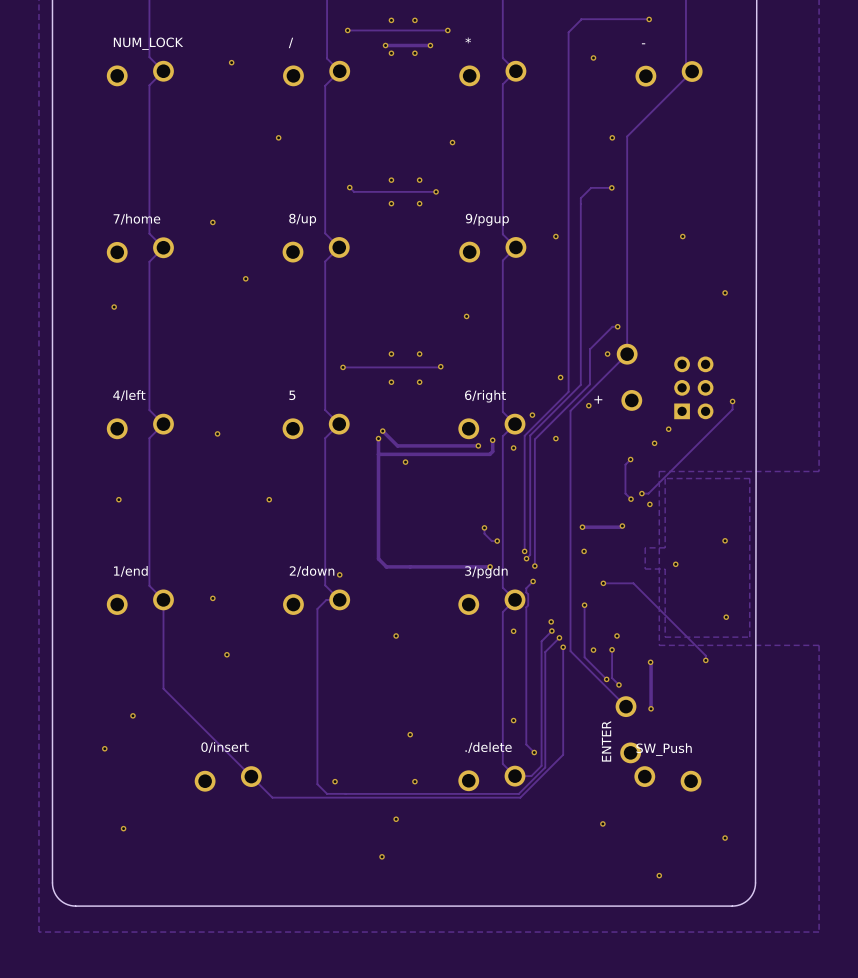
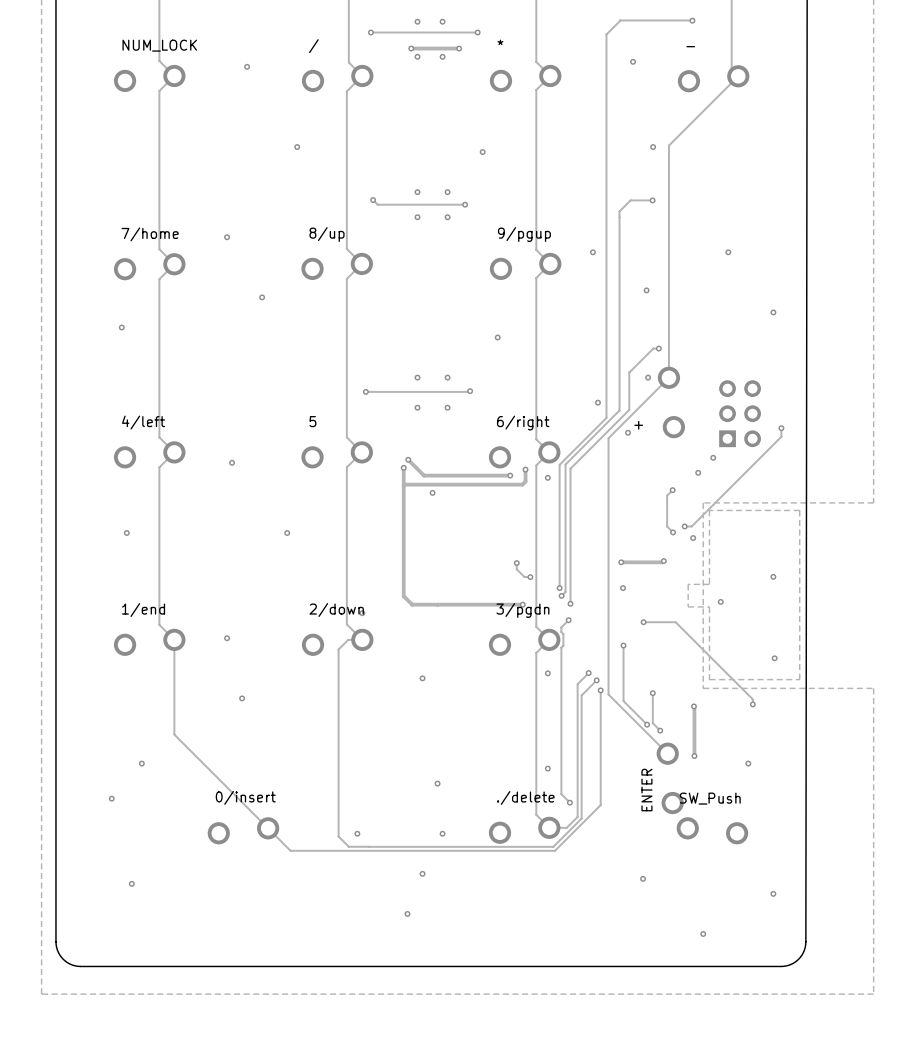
via: none -> (646, 290)
via: (532, 415) -> none
via: (555, 438) -> none
via: (551, 621) -> none
via: (617, 635) -> none
via: (593, 650) -> none
via: none -> (748, 763)

